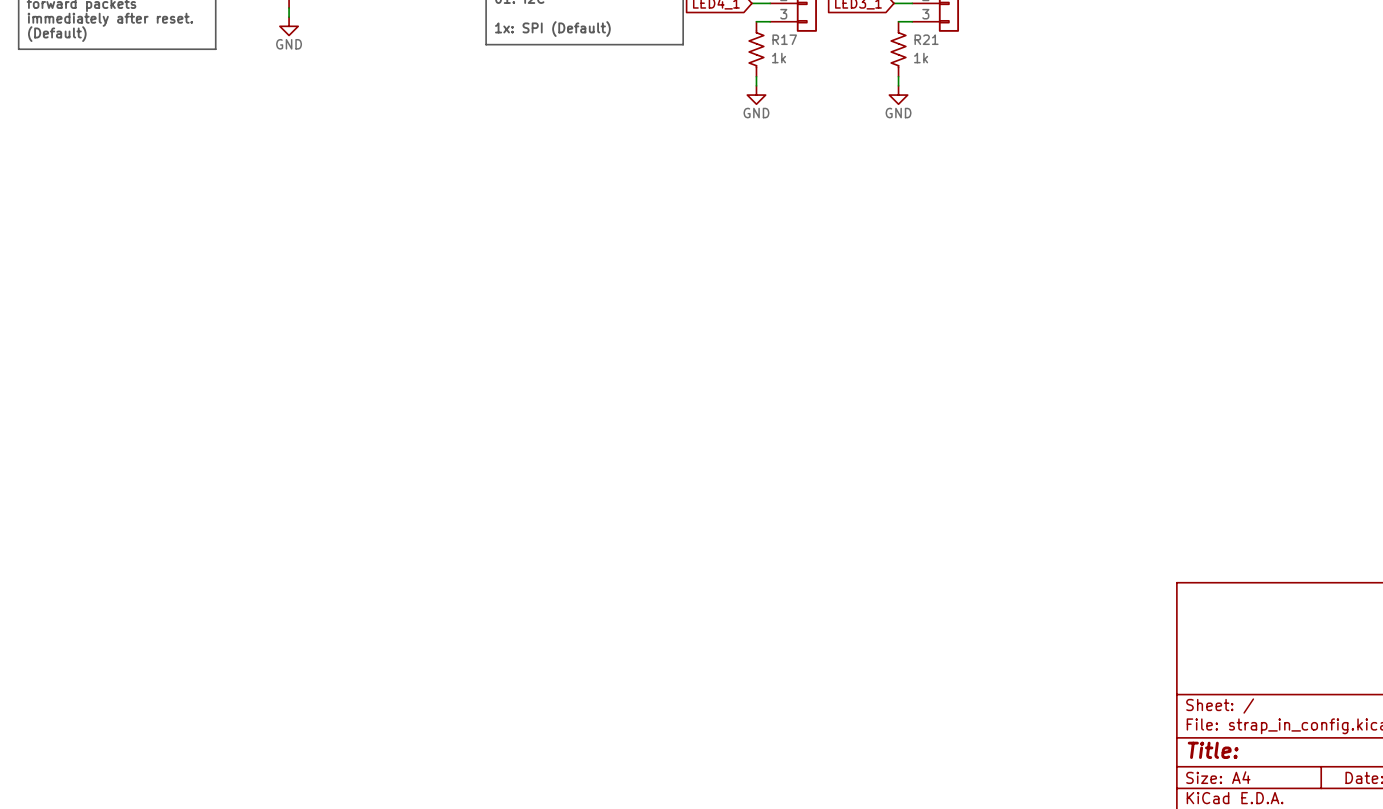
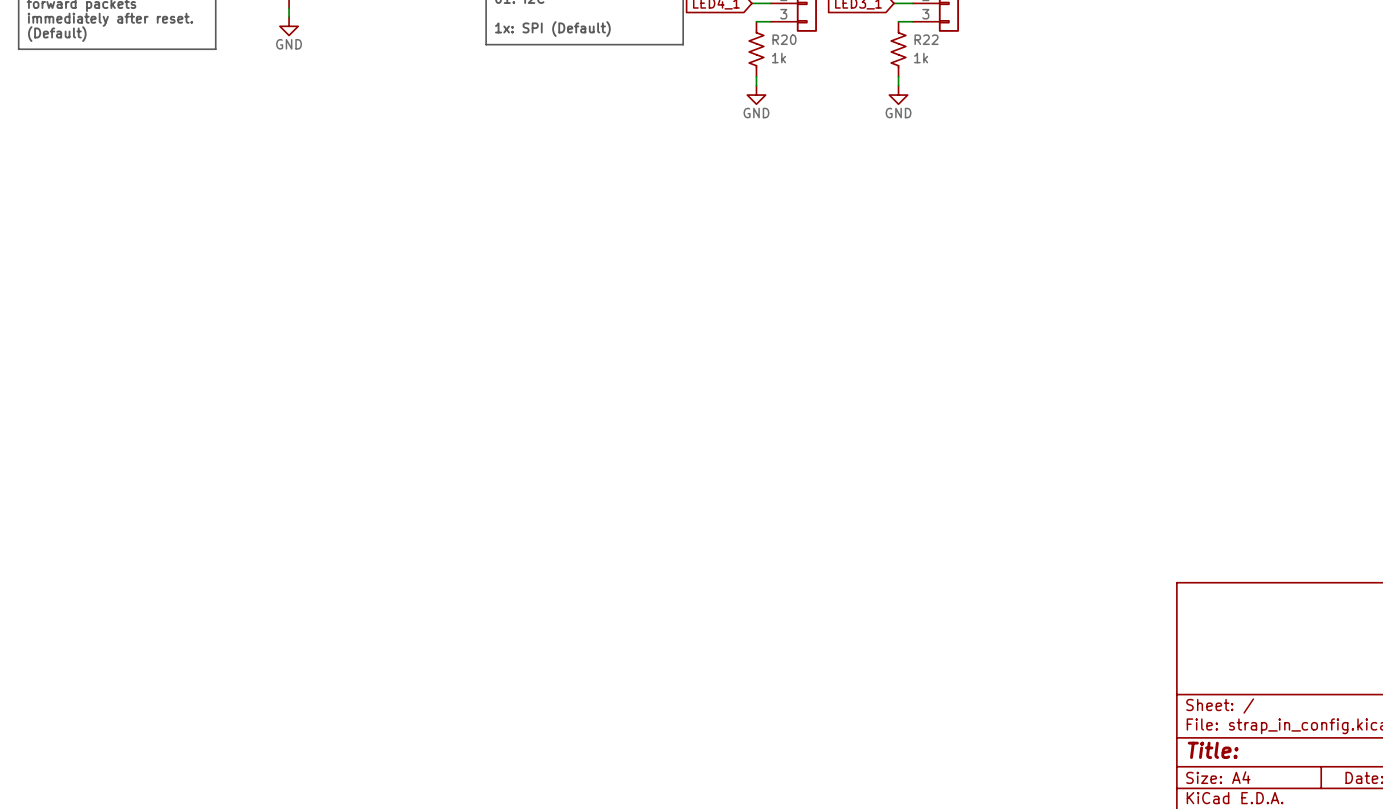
R17 name: R17 (784, 39) -> R20 (784, 39)
R21 name: R21 (926, 39) -> R22 (926, 39)

